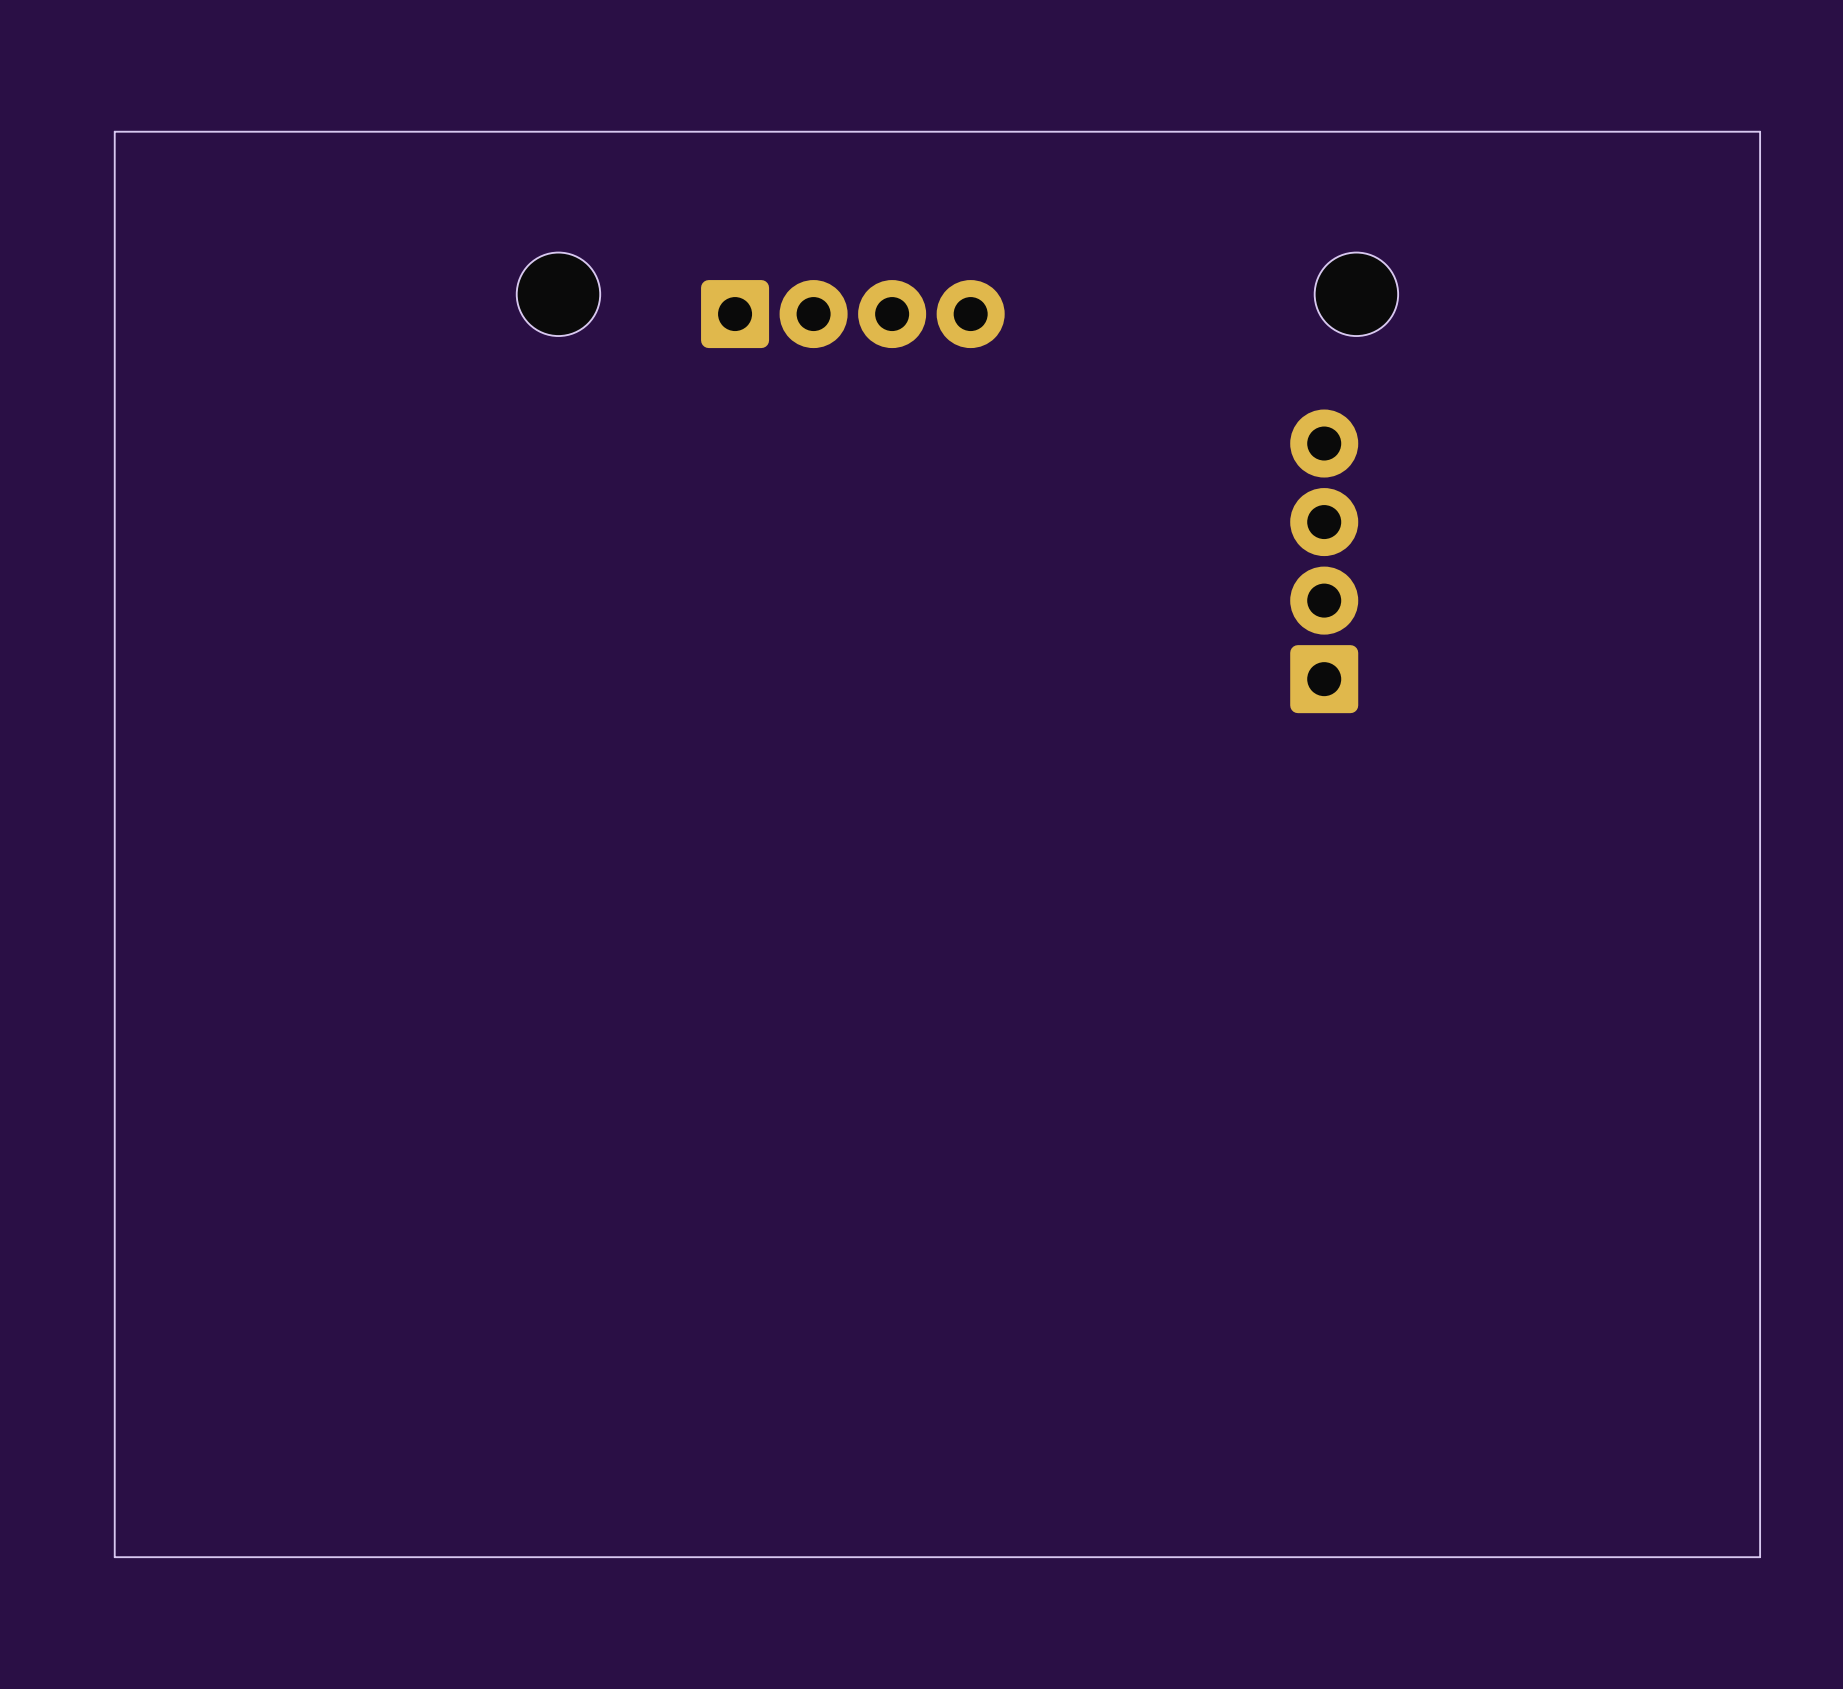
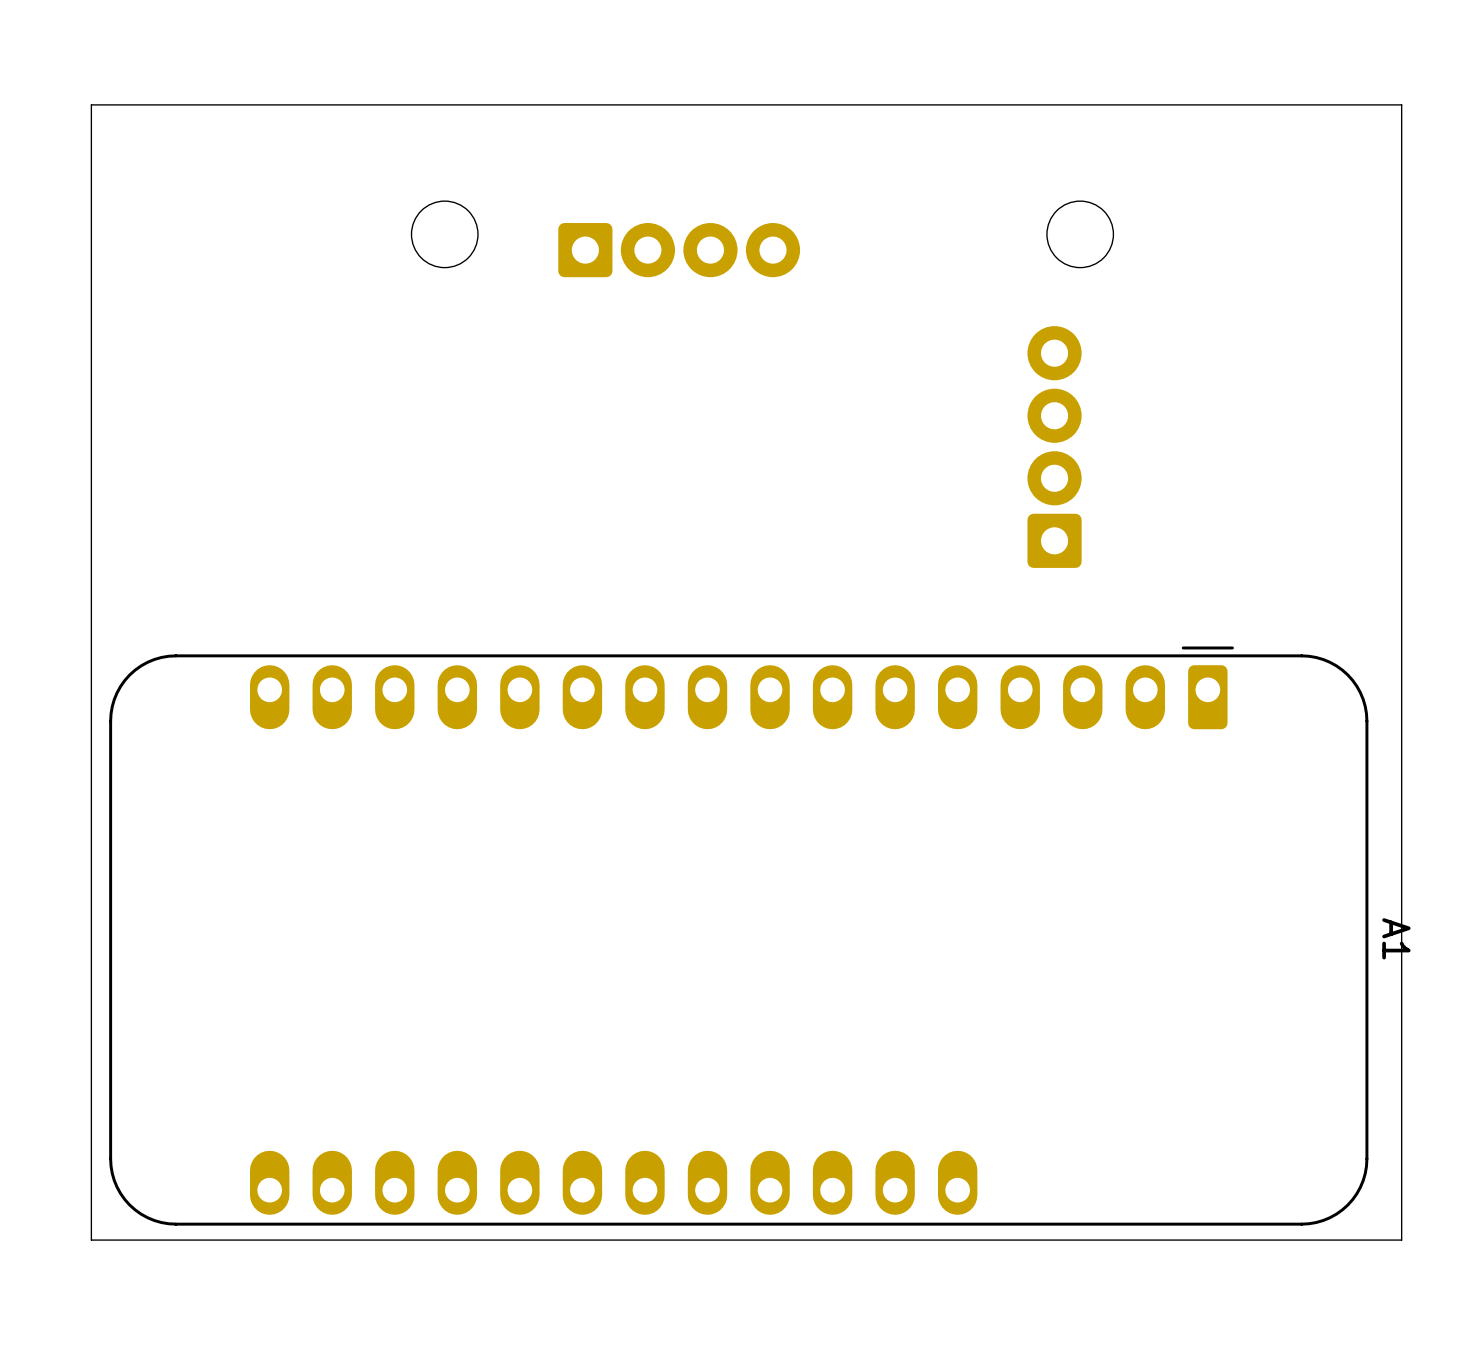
A1: none -> (738, 936)

